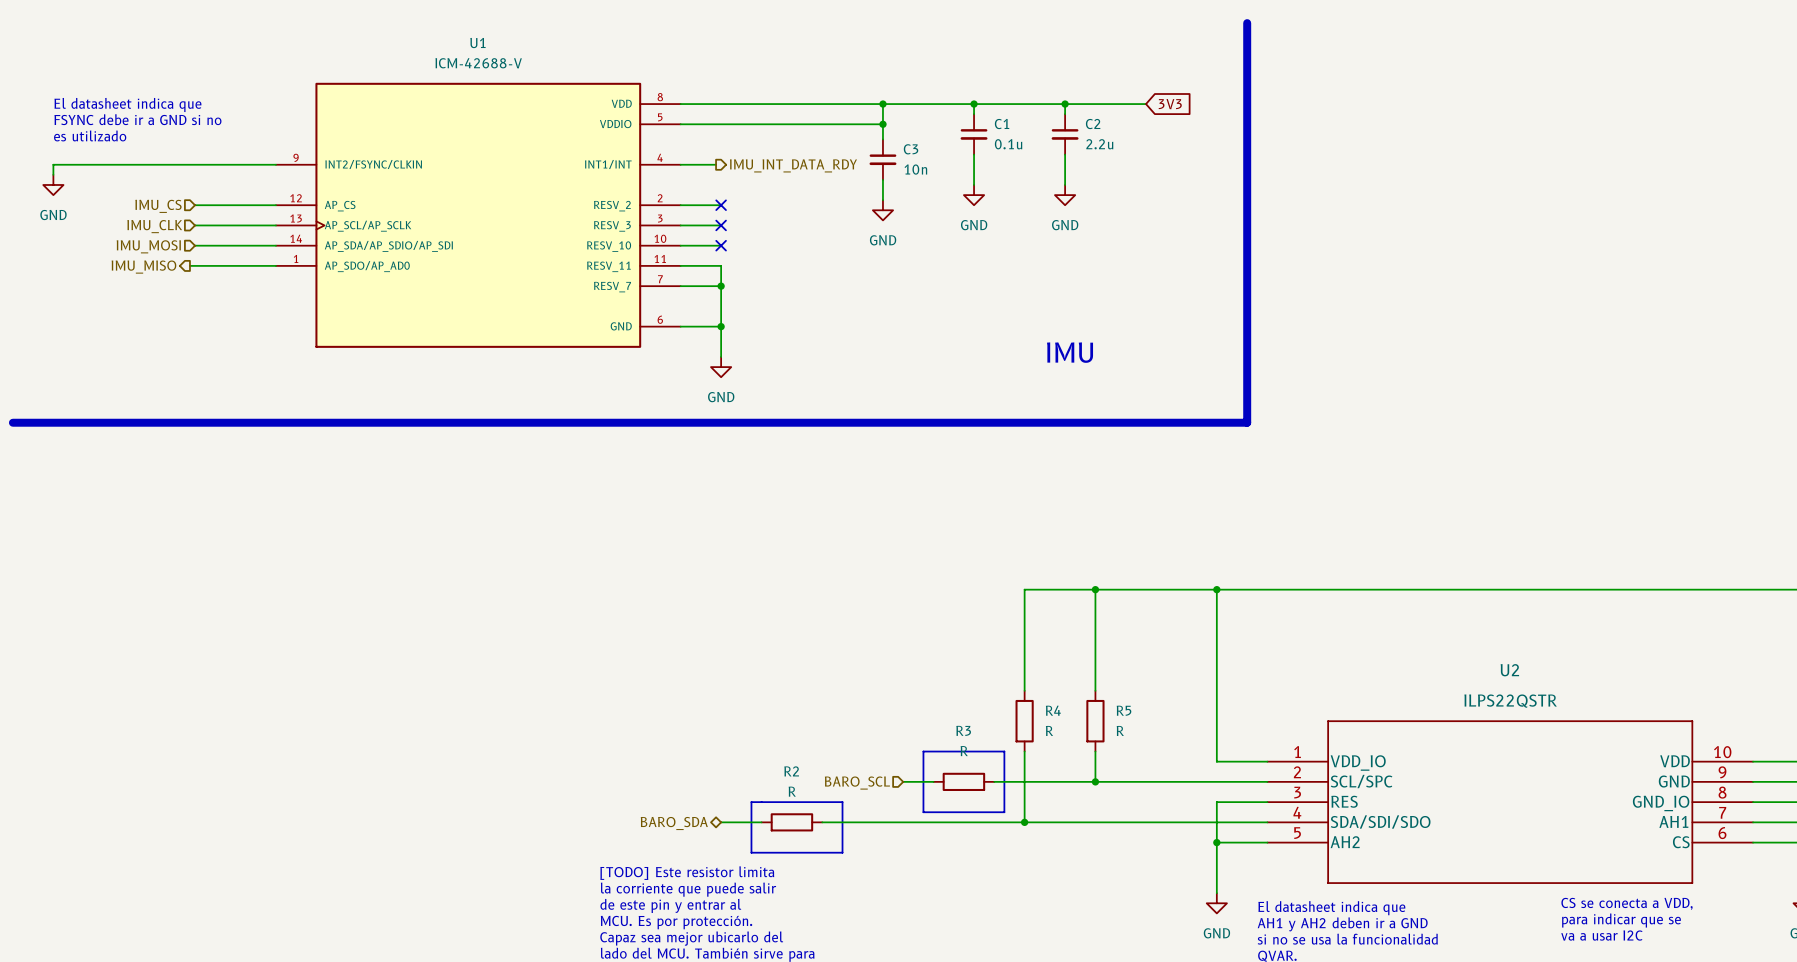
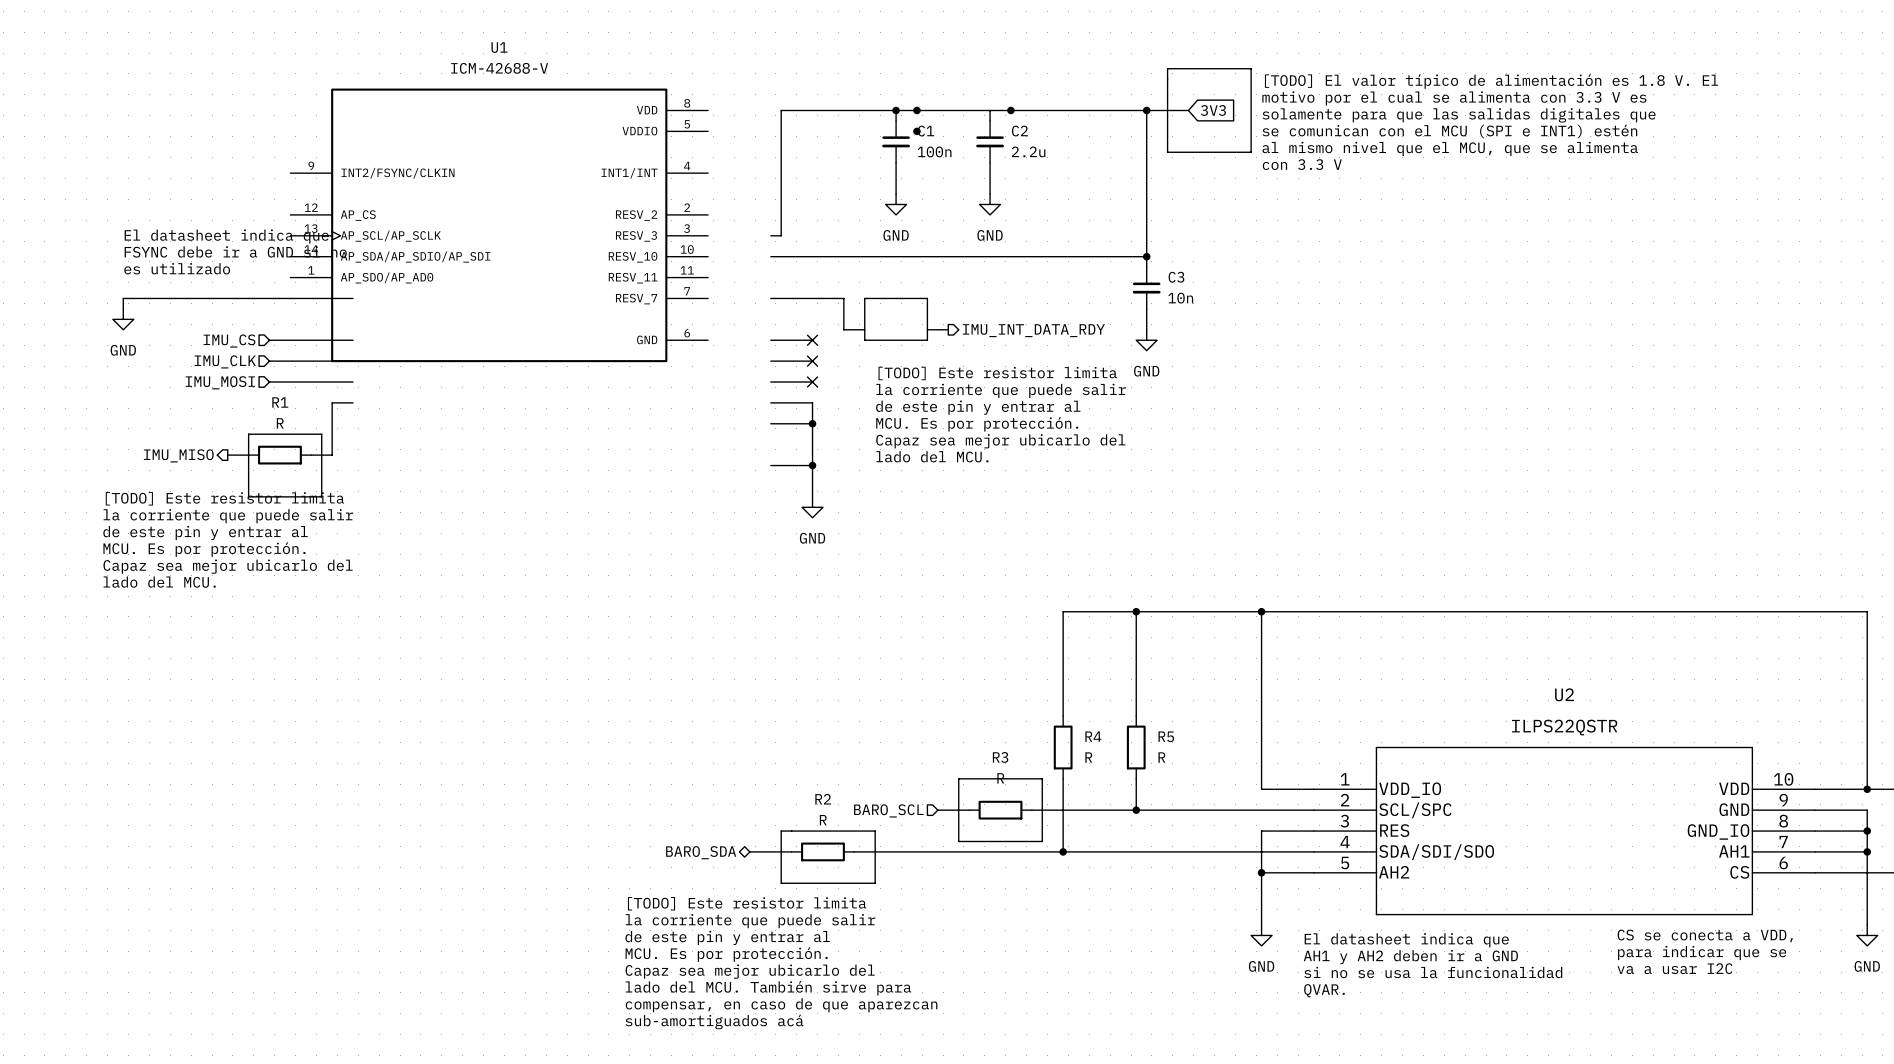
line: (1247, 23) (1247, 422) (12, 422) -> none
line: none -> (1167, 68) (1167, 152) (1251, 152) (1251, 68) (1167, 68)
text: none -> [TODO] El valor típico de alimentación es 1.8 V. El (1491, 81)
text: none -> motivo por el cual se alimenta con 3.3 V es (1454, 98)
text position: El datasheet indica que (127, 104) -> El datasheet indica que (226, 236)
wire: (680, 104) (751, 104) -> (770, 235) (781, 235) (781, 110)
junction: none -> (896, 110)
wire: (882, 104) (882, 139) -> none
wire: (974, 104) (974, 114) -> (896, 110) (896, 120)
wire: (1065, 104) (1065, 114) -> (990, 110) (990, 120)
junction position: (1065, 104) -> (1146, 110)
wire: none -> (1146, 110) (1146, 267)
text: none -> solamente para que las salidas digitales que (1459, 115)
text position: FSYNC debe ir a GND si no (137, 119) -> FSYNC debe ir a GND si no (235, 251)
wire: (680, 124) (882, 124) -> none
text: none -> se comunican con el MCU (SPI e INT1) estén (1449, 131)
C1 position: (974, 134) -> (896, 141)
C2 position: (1065, 134) -> (990, 141)
text position: es utilizado (90, 135) -> es utilizado (177, 268)
text: none -> al mismo nivel que el MCU, que se alimenta (1450, 148)
C1 value: 0.1u (1008, 144) -> 100n (934, 151)
wire: (974, 154) (974, 184) -> (896, 162) (896, 194)
wire: (1065, 154) (1065, 184) -> (990, 162) (990, 194)
text: none -> con 3.3 V (1302, 164)
C3 position: (882, 159) -> (1146, 288)
wire: (275, 164) (53, 164) (53, 174) -> (353, 298) (123, 298) (123, 308)
wire: (680, 164) (716, 164) -> none
hierarchical label: IMU_INT_DATA_RDY (793, 165) -> none
wire: (882, 179) (882, 200) -> none
power symbol position: GND (53, 184) -> GND (123, 319)
power symbol position: GND (974, 195) -> GND (990, 204)
power symbol: GND (1065, 195) -> none
wire: (195, 205) (275, 205) -> (269, 340) (353, 340)
wire: (680, 205) (721, 205) -> (770, 340) (812, 340)
no-connect mark: (721, 205) -> none
hierarchical label position: IMU_CS (158, 206) -> IMU_CS (229, 341)
power symbol position: GND (882, 210) -> GND (896, 204)
wire: (195, 225) (275, 225) -> (269, 361) (353, 361)
wire: (680, 225) (721, 225) -> (770, 361) (812, 361)
no-connect mark: (721, 225) -> none
hierarchical label position: IMU_CLK (154, 226) -> IMU_CLK (225, 361)
wire: (195, 245) (275, 245) -> (269, 382) (353, 382)
wire: (680, 245) (721, 245) -> (770, 382) (812, 382)
no-connect mark: (721, 245) -> none
wire: none -> (770, 256) (1146, 256)
junction: none -> (1146, 256)
hierarchical label position: IMU_MOSI (148, 246) -> IMU_MOSI (220, 382)
wire: (189, 265) (275, 265) -> none
wire: (680, 265) (721, 265) (721, 356) -> (770, 402) (812, 402) (812, 496)
hierarchical label position: IMU_MISO (143, 267) -> IMU_MISO (178, 455)
wire: (680, 286) (721, 286) -> (770, 423) (812, 423)
junction: (721, 286) -> none
wire: none -> (770, 298) (843, 298) (843, 329) (864, 329)
line: none -> (864, 298) (864, 340) (927, 340) (927, 298) (864, 298)
wire: none -> (1146, 308) (1146, 329)
wire: none -> (927, 329) (948, 329)
hierarchical label: none -> IMU_INT_DATA_RDY (1033, 330)
wire: (680, 326) (721, 326) -> (770, 465) (812, 465)
junction: (721, 326) -> none
no-connect mark: none -> (812, 340)
power symbol: none -> GND (1146, 340)
no-connect mark: none -> (812, 361)
text: IMU (1070, 352) -> none
text: none -> [TODO] Este resistor limita (997, 373)
power symbol: GND (721, 367) -> none
no-connect mark: none -> (812, 382)
text: none -> la corriente que puede salir (1001, 390)
wire: none -> (353, 402) (332, 402) (332, 455) (311, 455)
text: none -> de este pin y entrar al (978, 407)
junction: none -> (812, 423)
text: none -> MCU. Es por protección. (977, 424)
line: none -> (248, 434) (321, 434) (321, 496) (248, 496) (248, 434)
text: none -> Capaz sea mejor ubicarlo del (1000, 441)
wire: none -> (227, 455) (248, 455)
R1: none -> R (279, 455)
text: none -> lado del MCU. (932, 456)
junction: none -> (812, 465)
text: none -> [TODO] Este resistor limita (224, 498)
power symbol: none -> GND (812, 507)
text: none -> la corriente que puede salir (228, 516)
text: none -> de este pin y entrar al (205, 532)
text: none -> MCU. Es por protección. (204, 549)
text: none -> Capaz sea mejor ubicarlo del (228, 566)
text: none -> lado del MCU. (159, 582)

